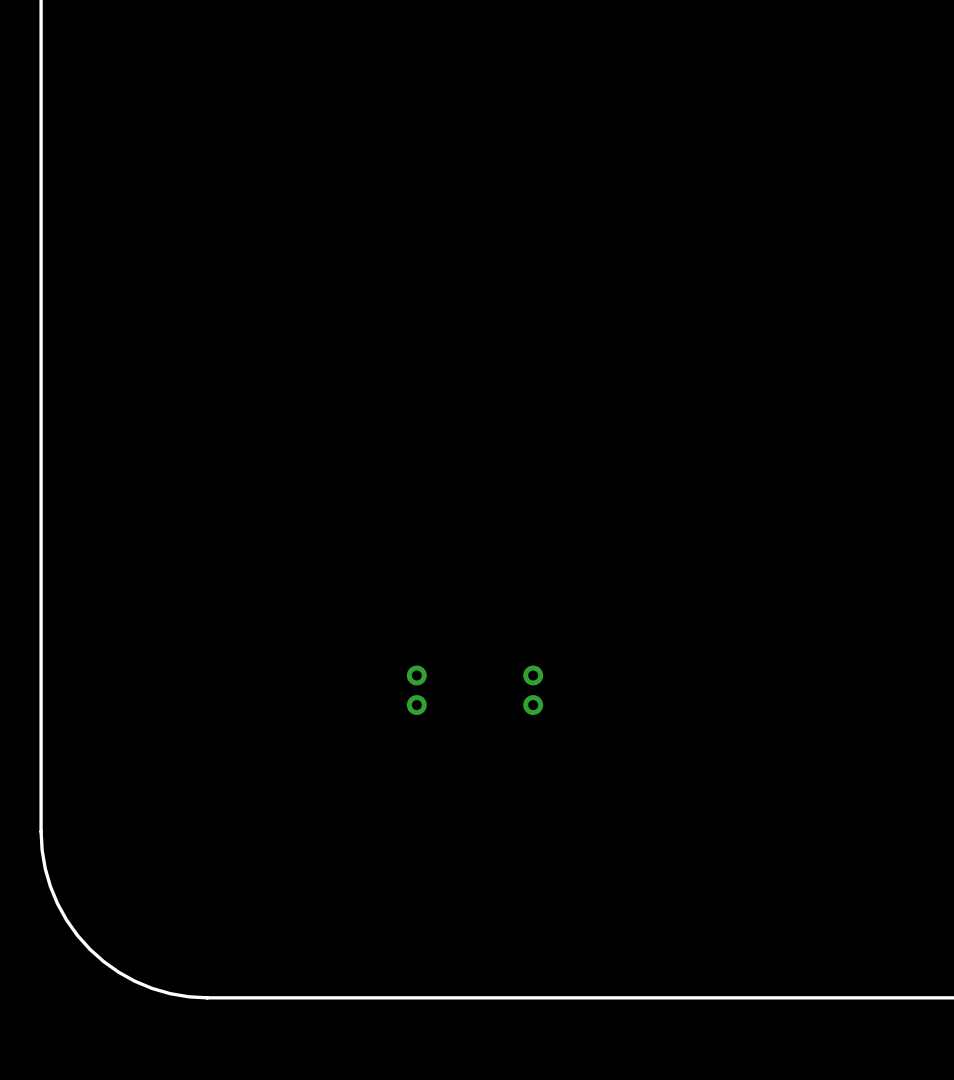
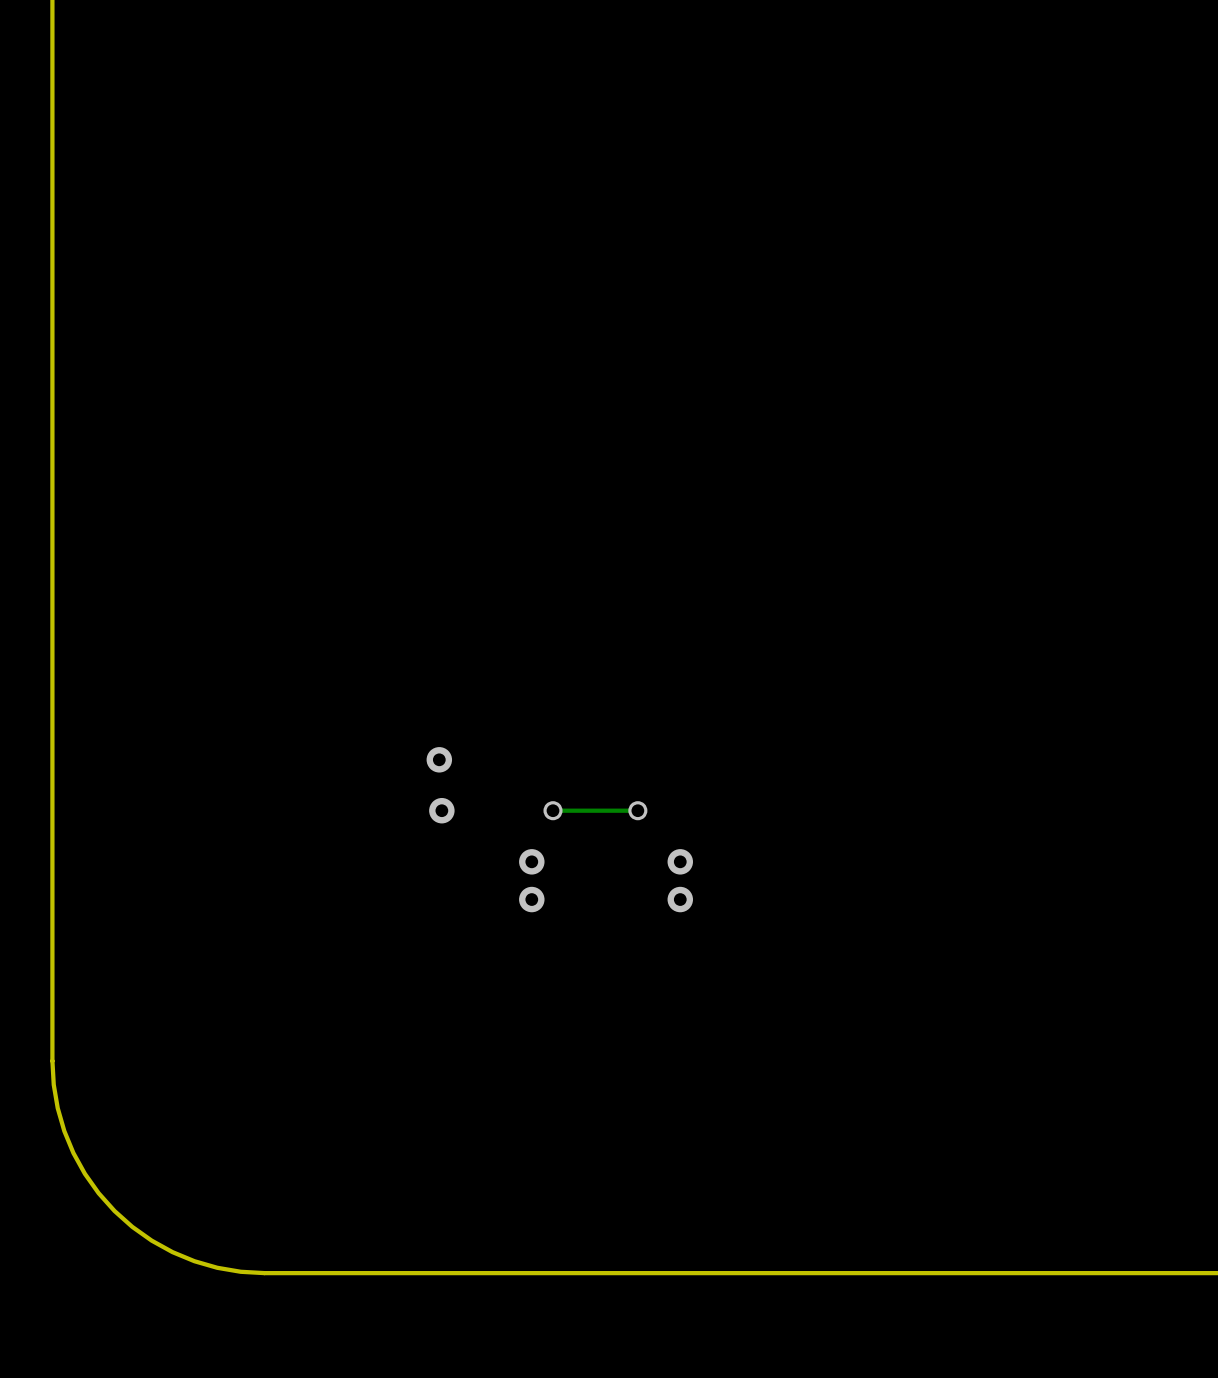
via: none -> (439, 759)
via: none -> (441, 810)
via: none -> (553, 810)
track: none -> (637, 810) (553, 810)
via: none -> (637, 810)

